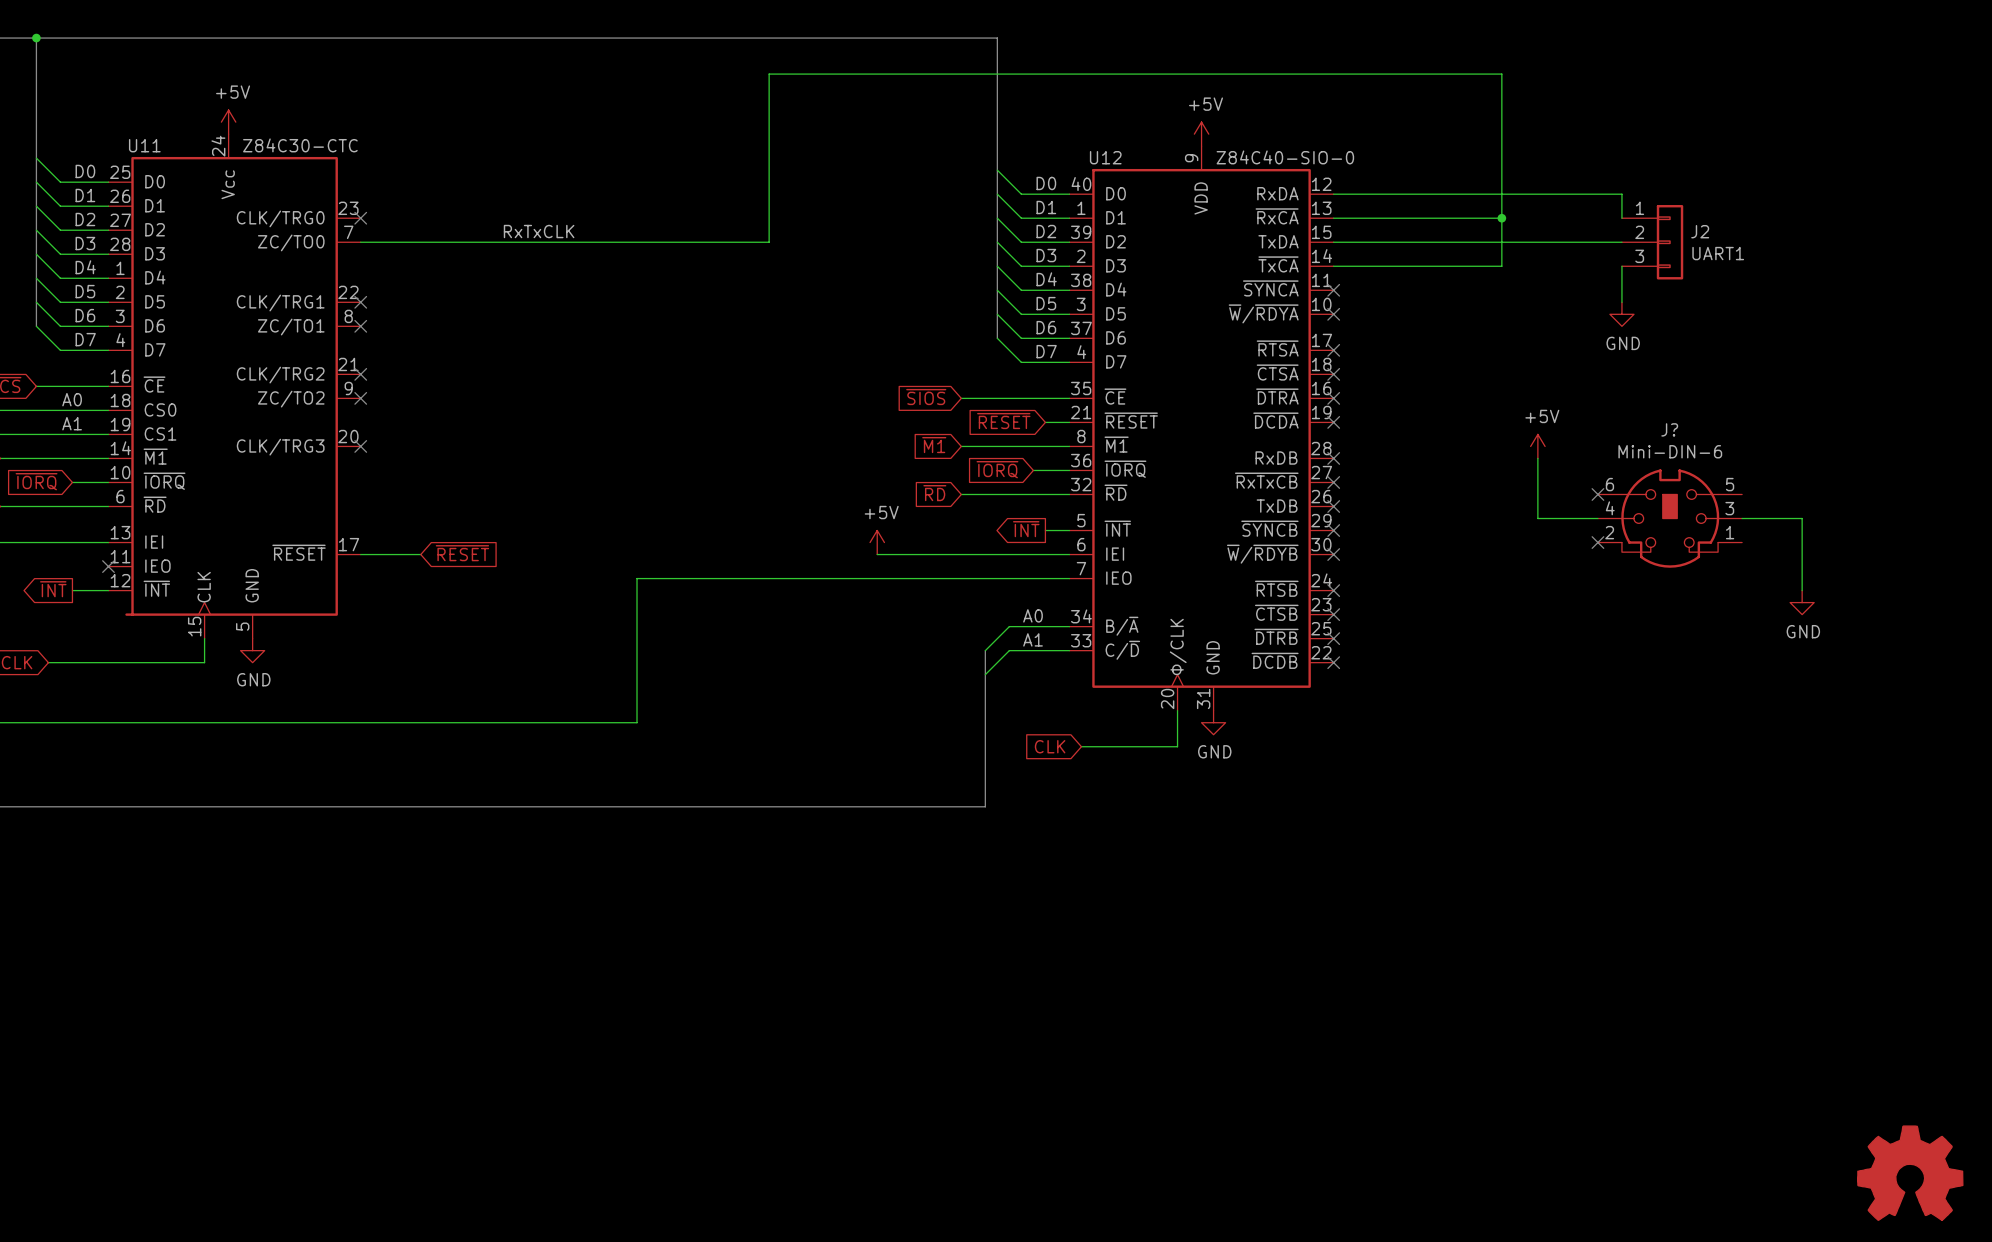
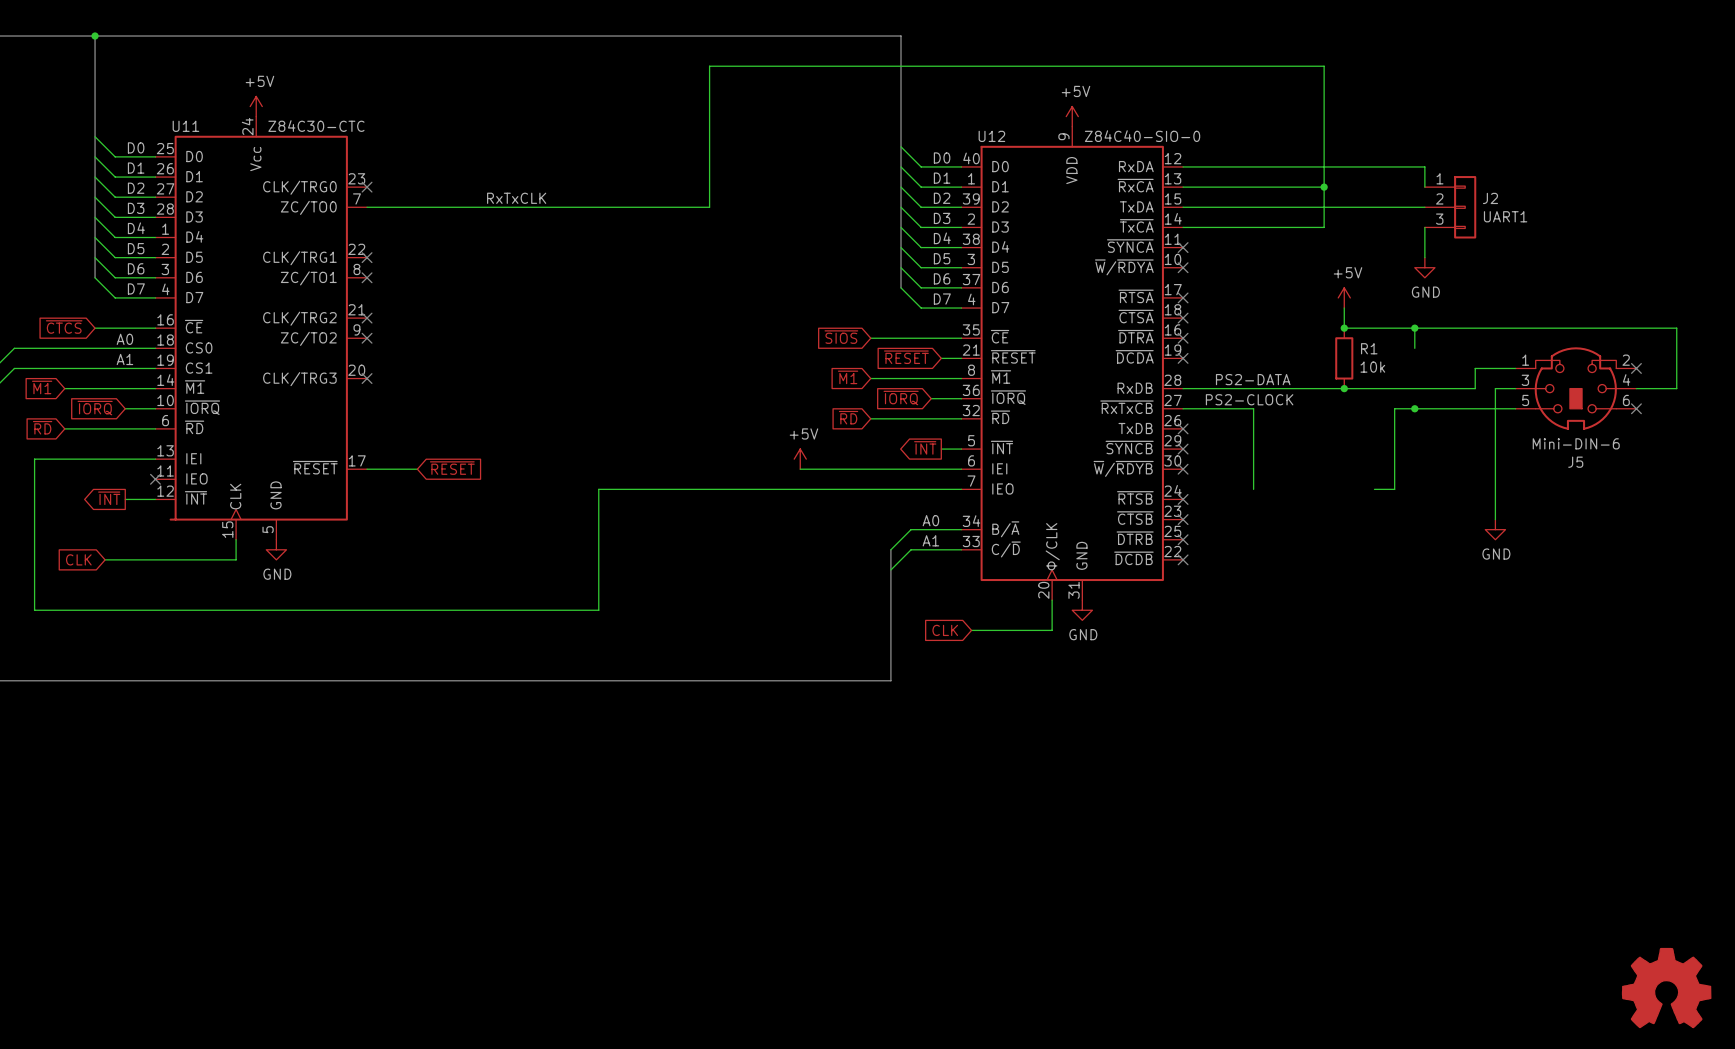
wire: none -> (1344, 308) (1344, 328) (1676, 328) (1676, 388) (1636, 388)
junction: none -> (1344, 328)
wire: none -> (1414, 328) (1414, 348)
junction: none -> (1414, 328)
R1: none -> 10k (1344, 358)
wire: none -> (1515, 368) (1475, 368) (1475, 388) (1183, 388)
no-connect mark: none -> (1636, 368)
power symbol position: +5V (1537, 446) -> +5V (1344, 297)
label: none -> PS2-DATA (1253, 379)
no-connect mark: (1333, 458) -> none
junction: none -> (1344, 388)
wire: (1537, 458) (1537, 518) (1597, 518) -> none
wire: none -> (1515, 388) (1495, 388) (1495, 519)
J5: none -> Mini-DIN-6 (1575, 388)
label: none -> PS2-CLOCK (1249, 399)
wire: none -> (1183, 408) (1253, 408) (1253, 489)
no-connect mark: (1333, 482) -> none
junction: none -> (1414, 408)
wire: none -> (1515, 408) (1394, 408) (1394, 489) (1374, 489)
no-connect mark: none -> (1636, 408)
no-connect mark: (1597, 494) -> none
J?: Mini-DIN-6 (1670, 518) -> none
wire: (1742, 518) (1802, 518) (1802, 590) -> none
no-connect mark: (1597, 542) -> none
power symbol position: GND (1802, 602) -> GND (1495, 529)

